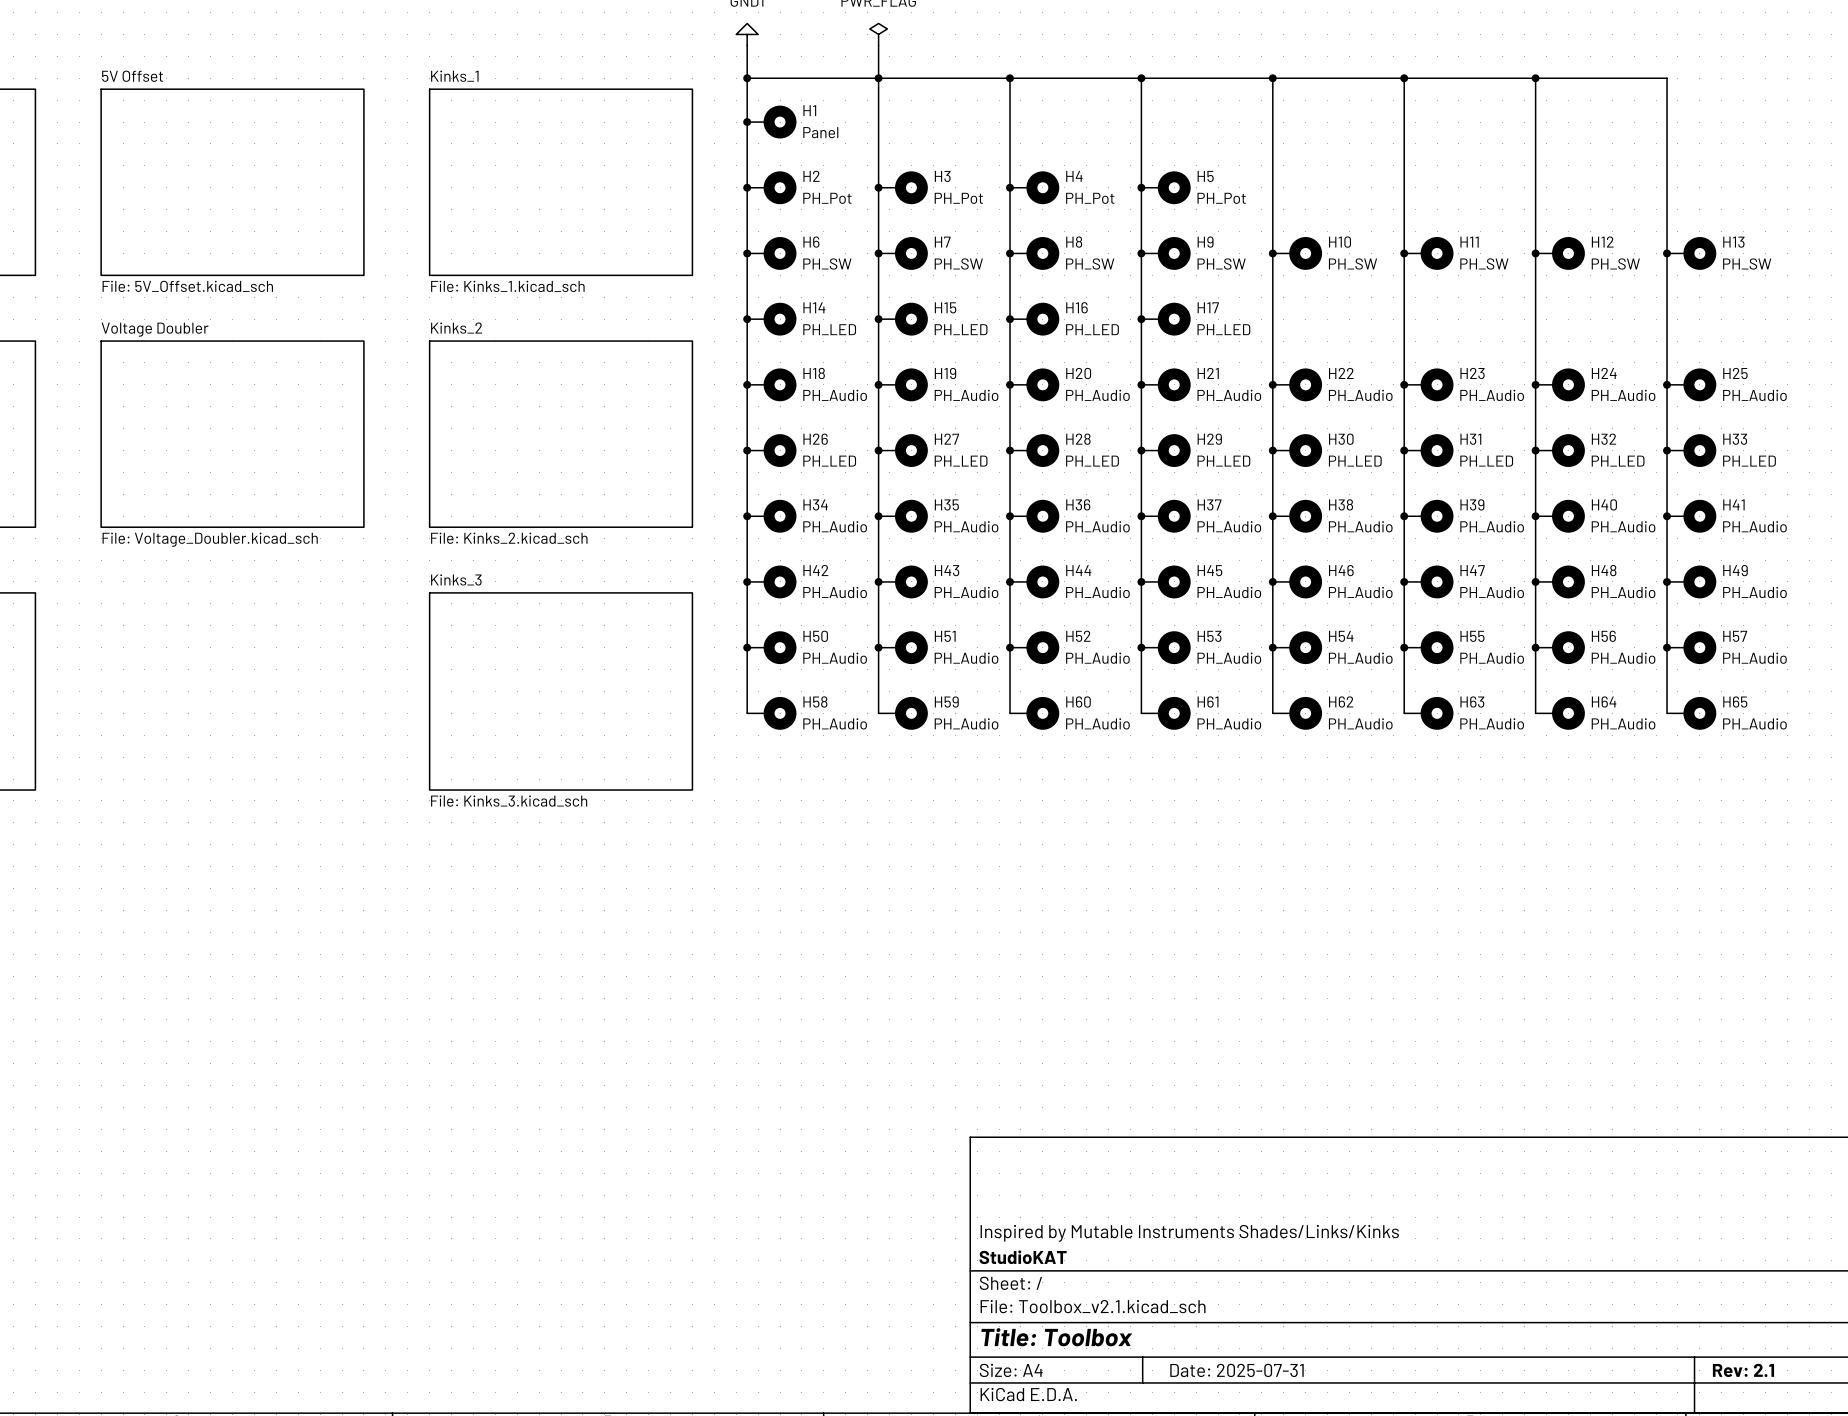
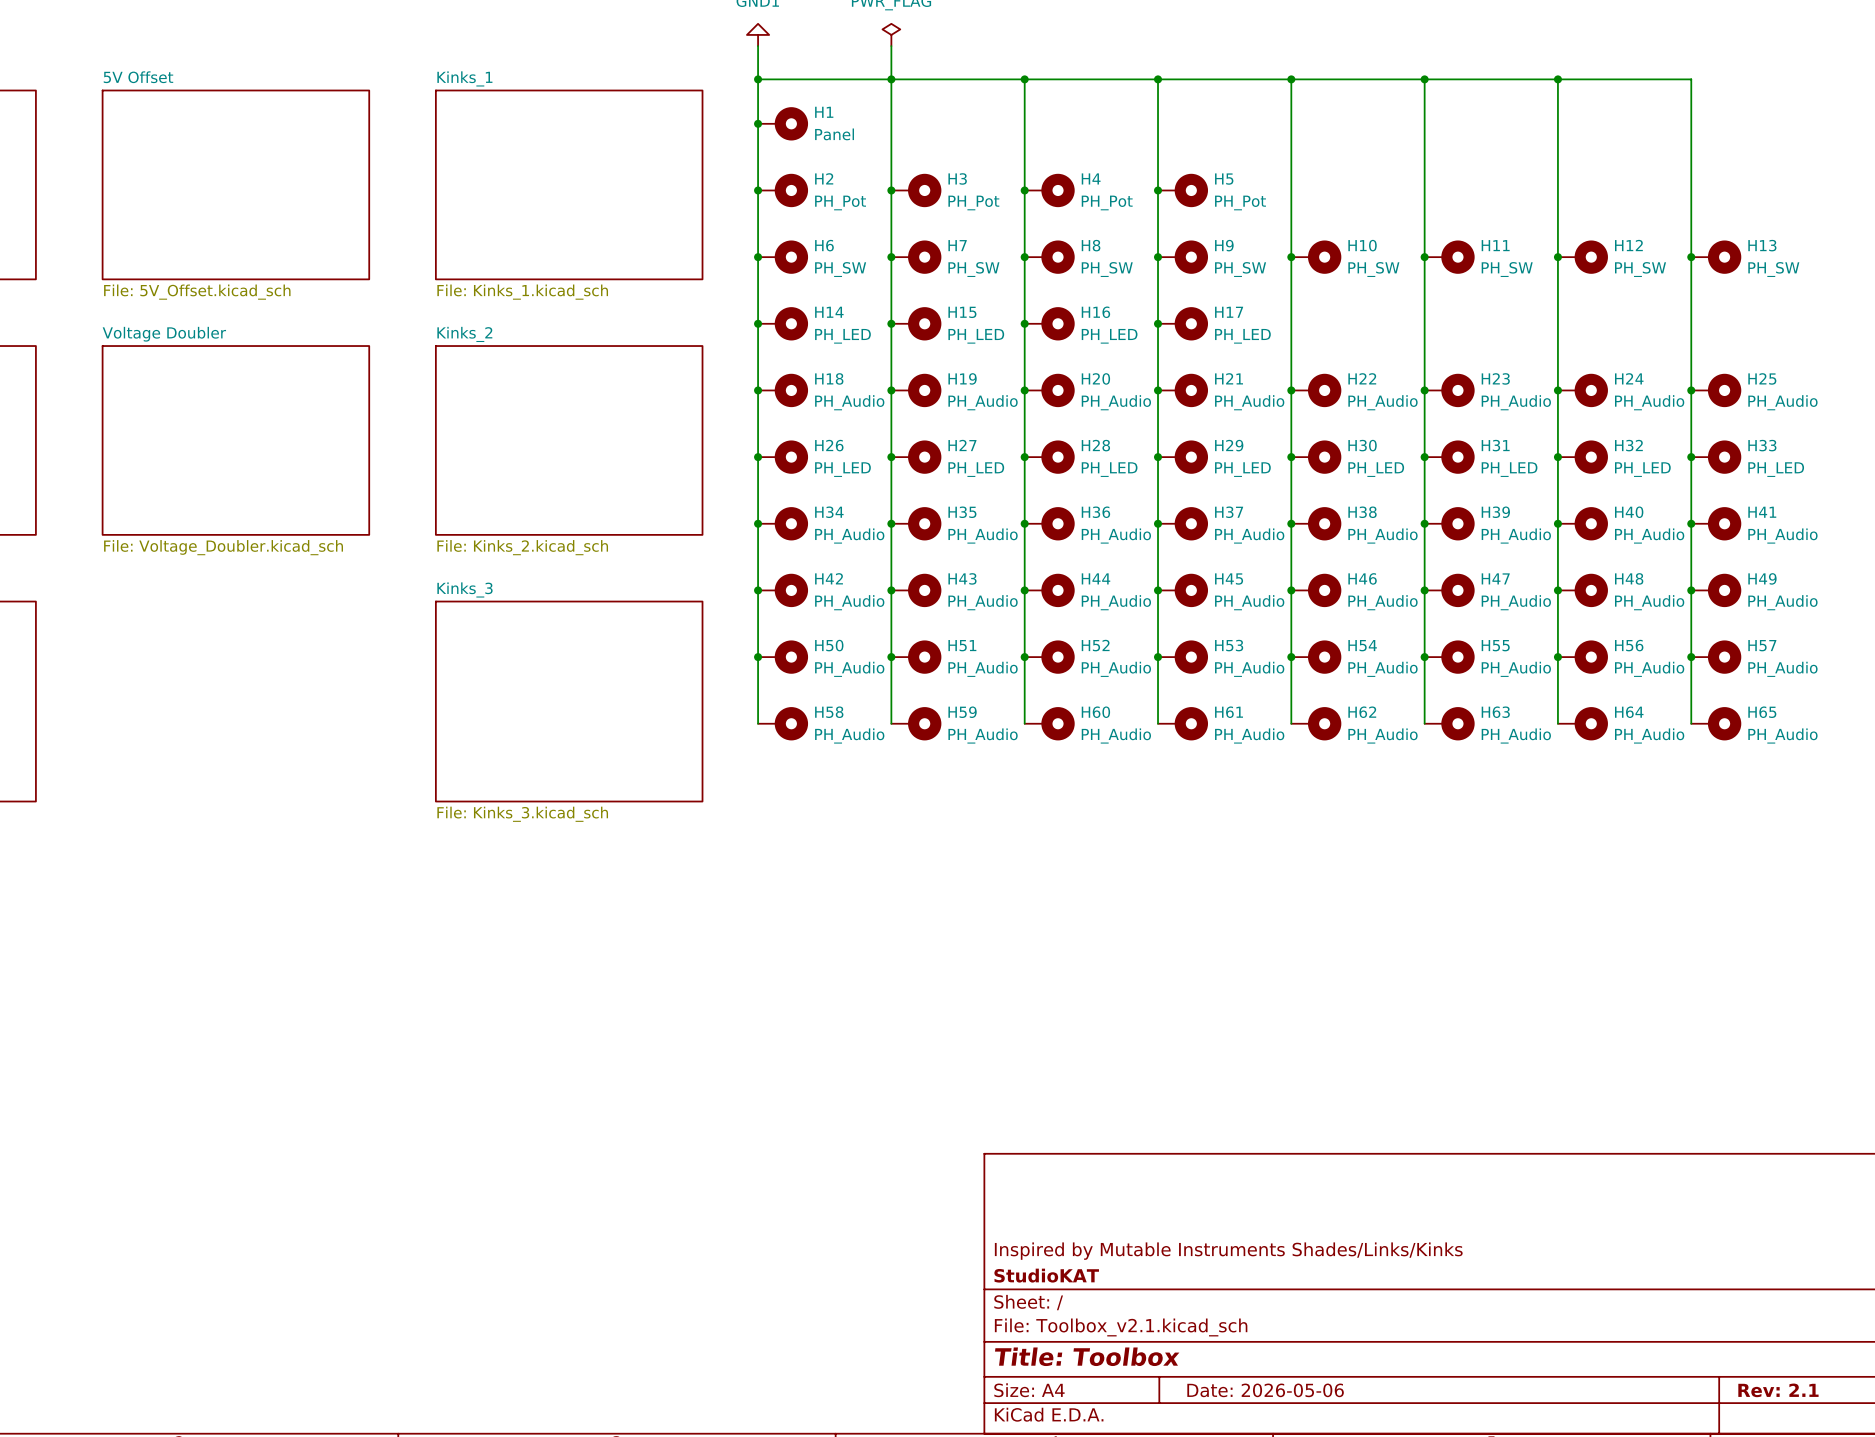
title block: Date: 2025-07-31 (1236, 1370) -> Date: 2026-05-06 (1265, 1390)

